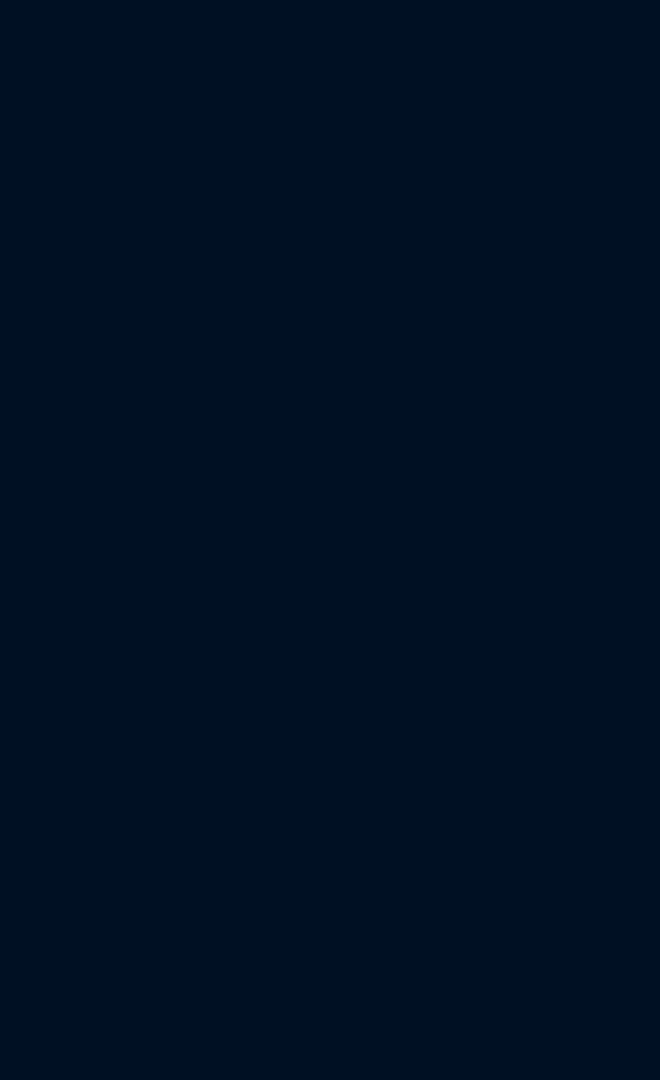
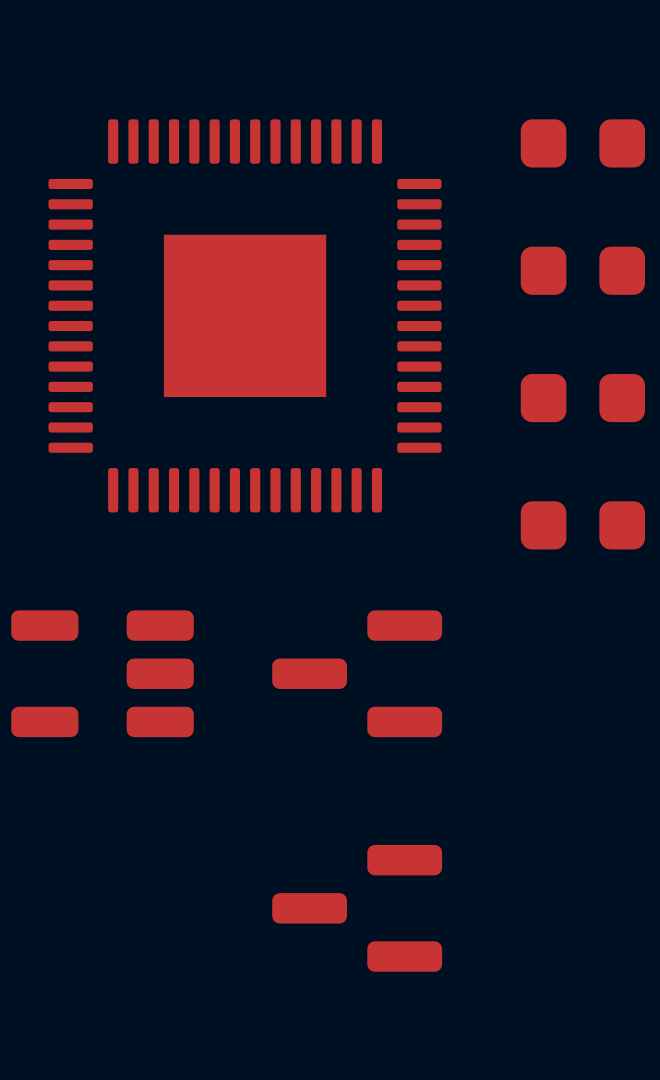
part: none -> (582, 143)
part: none -> (582, 270)
part: none -> (245, 315)
part: none -> (582, 398)
part: none -> (582, 525)
part: none -> (102, 673)
part: none -> (357, 673)
part: none -> (357, 908)

